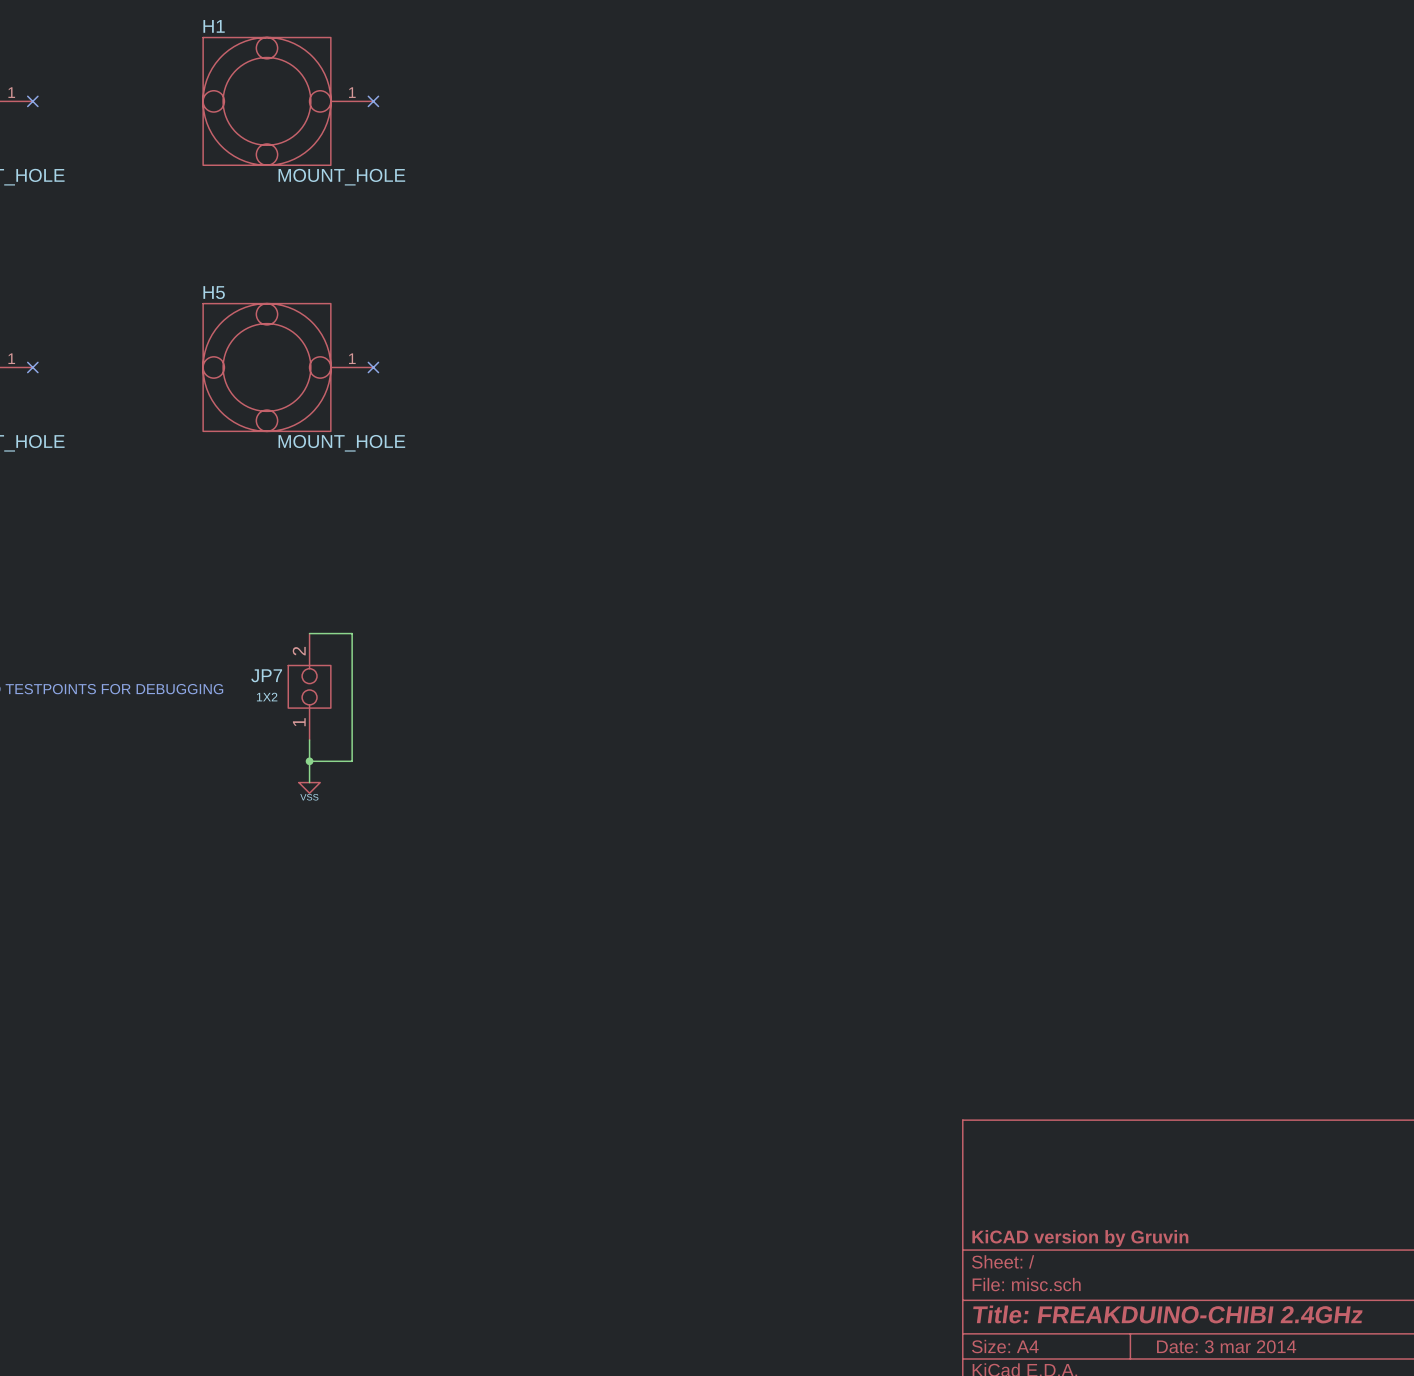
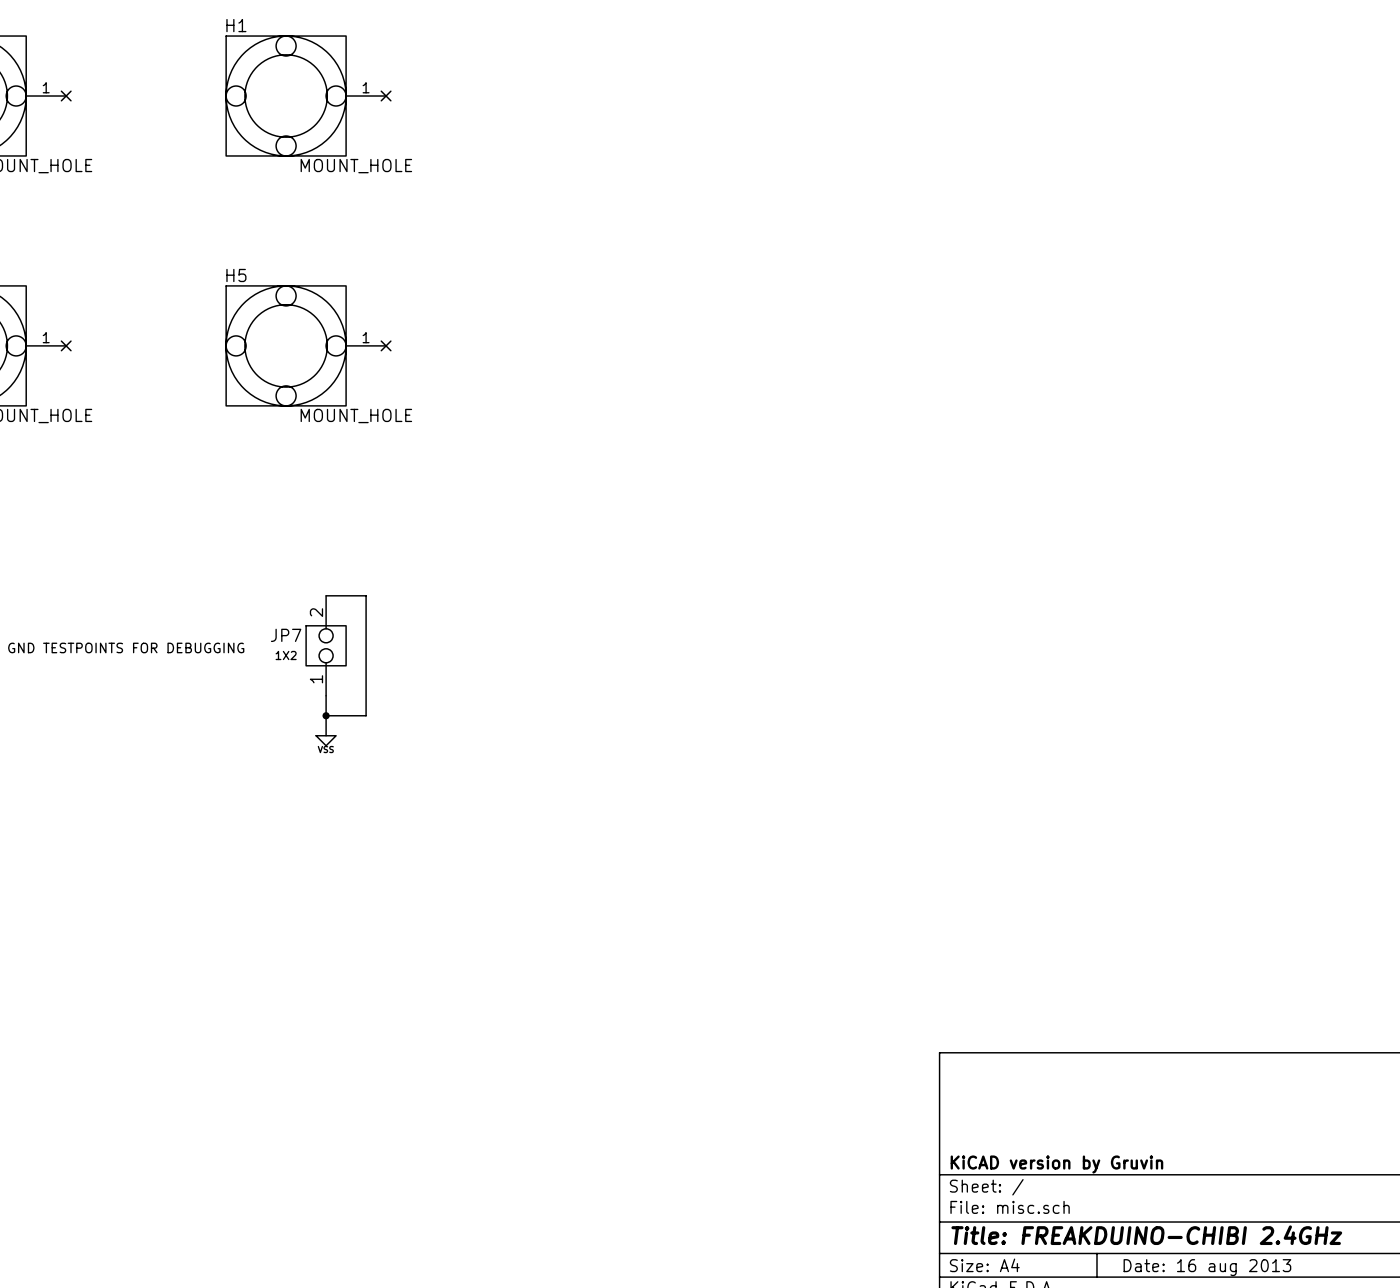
title block: Date: 3 mar 2014 (1226, 1346) -> Date: 16 aug 2013 (1207, 1267)

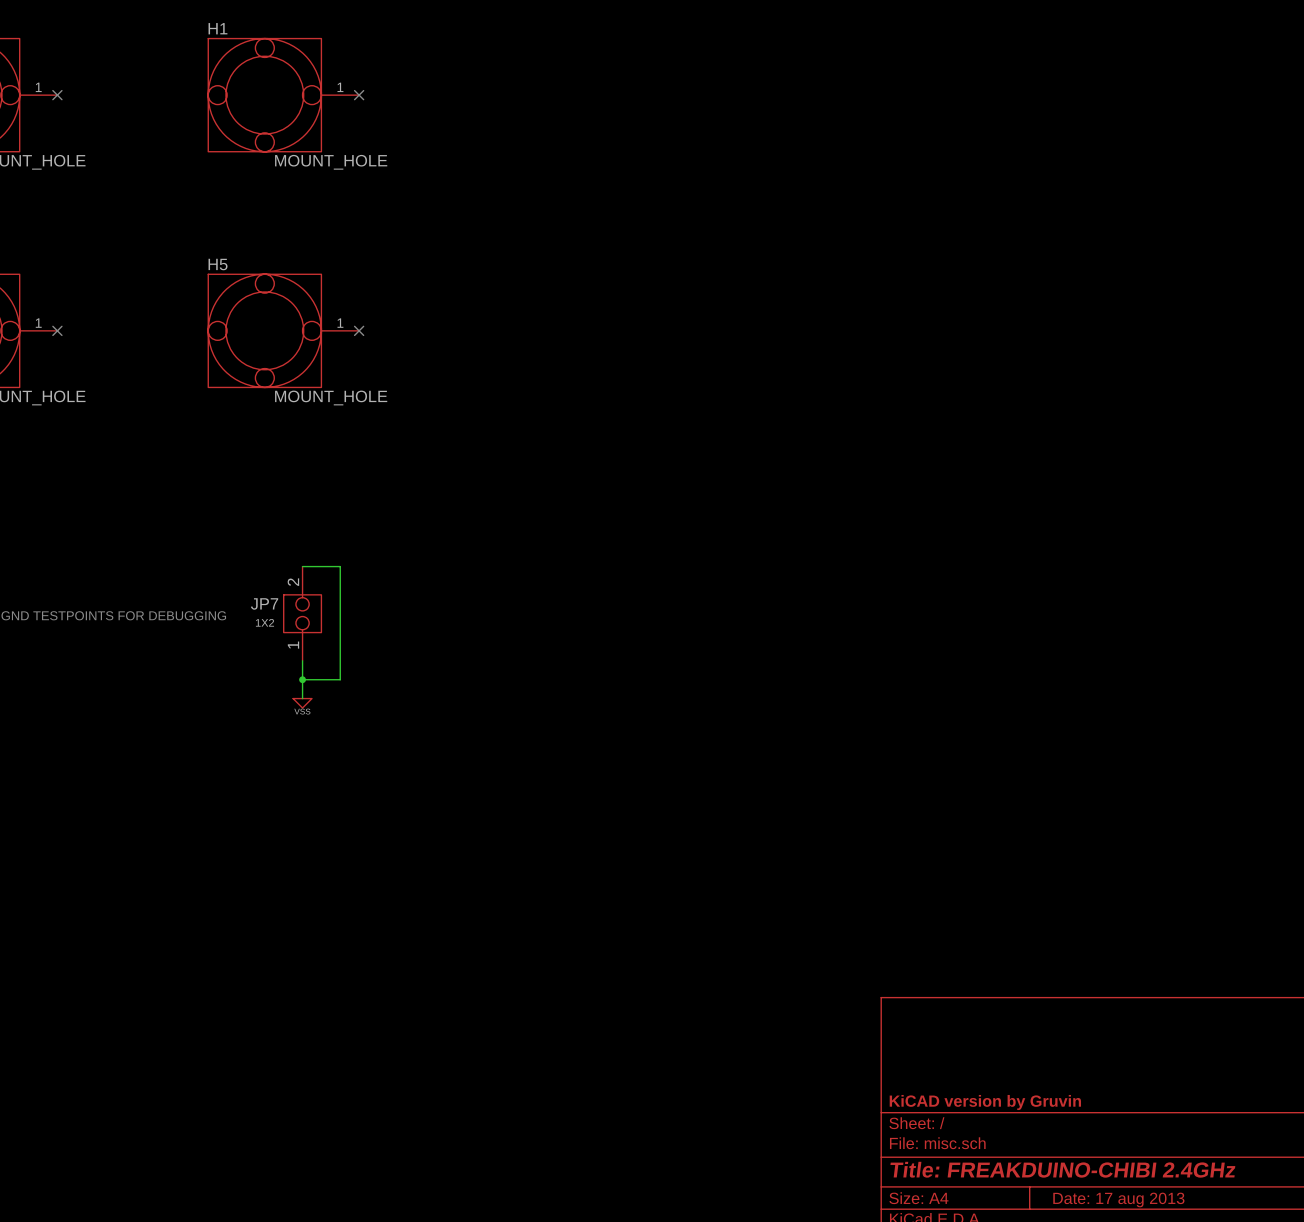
title block: Date: 16 aug 2013 (1207, 1267) -> Date: 17 aug 2013 (1118, 1199)

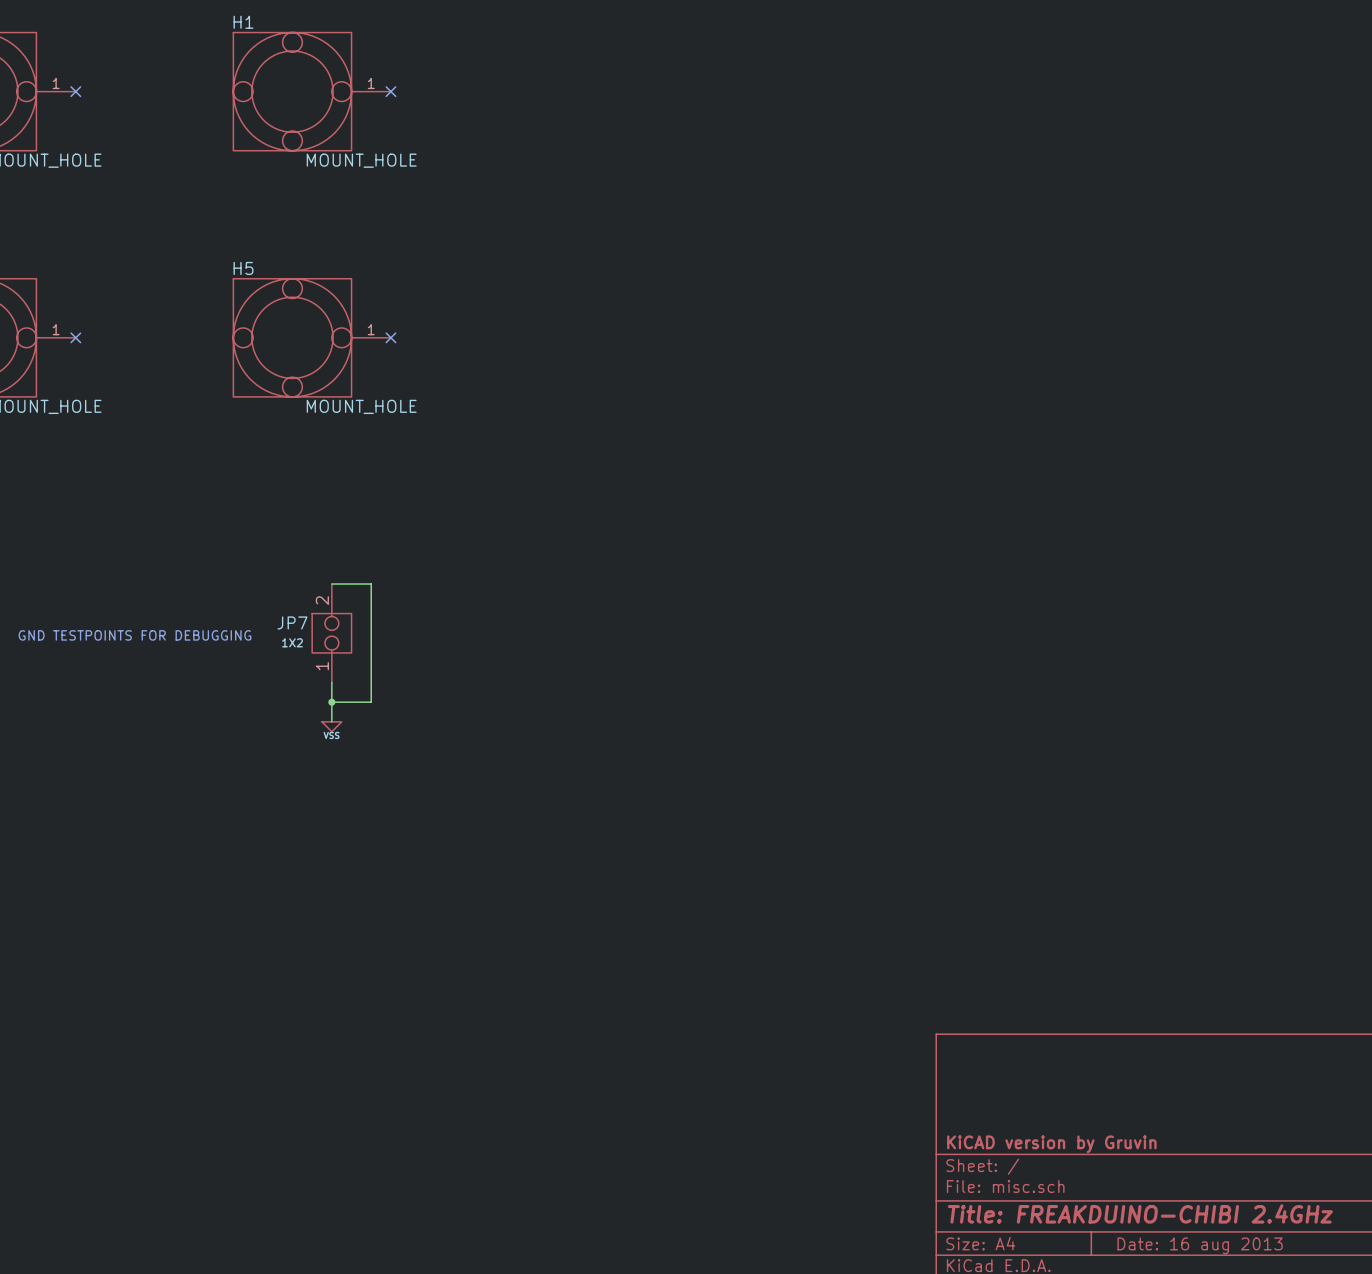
title block: Date: 17 aug 2013 (1118, 1199) -> Date: 16 aug 2013 (1200, 1245)

